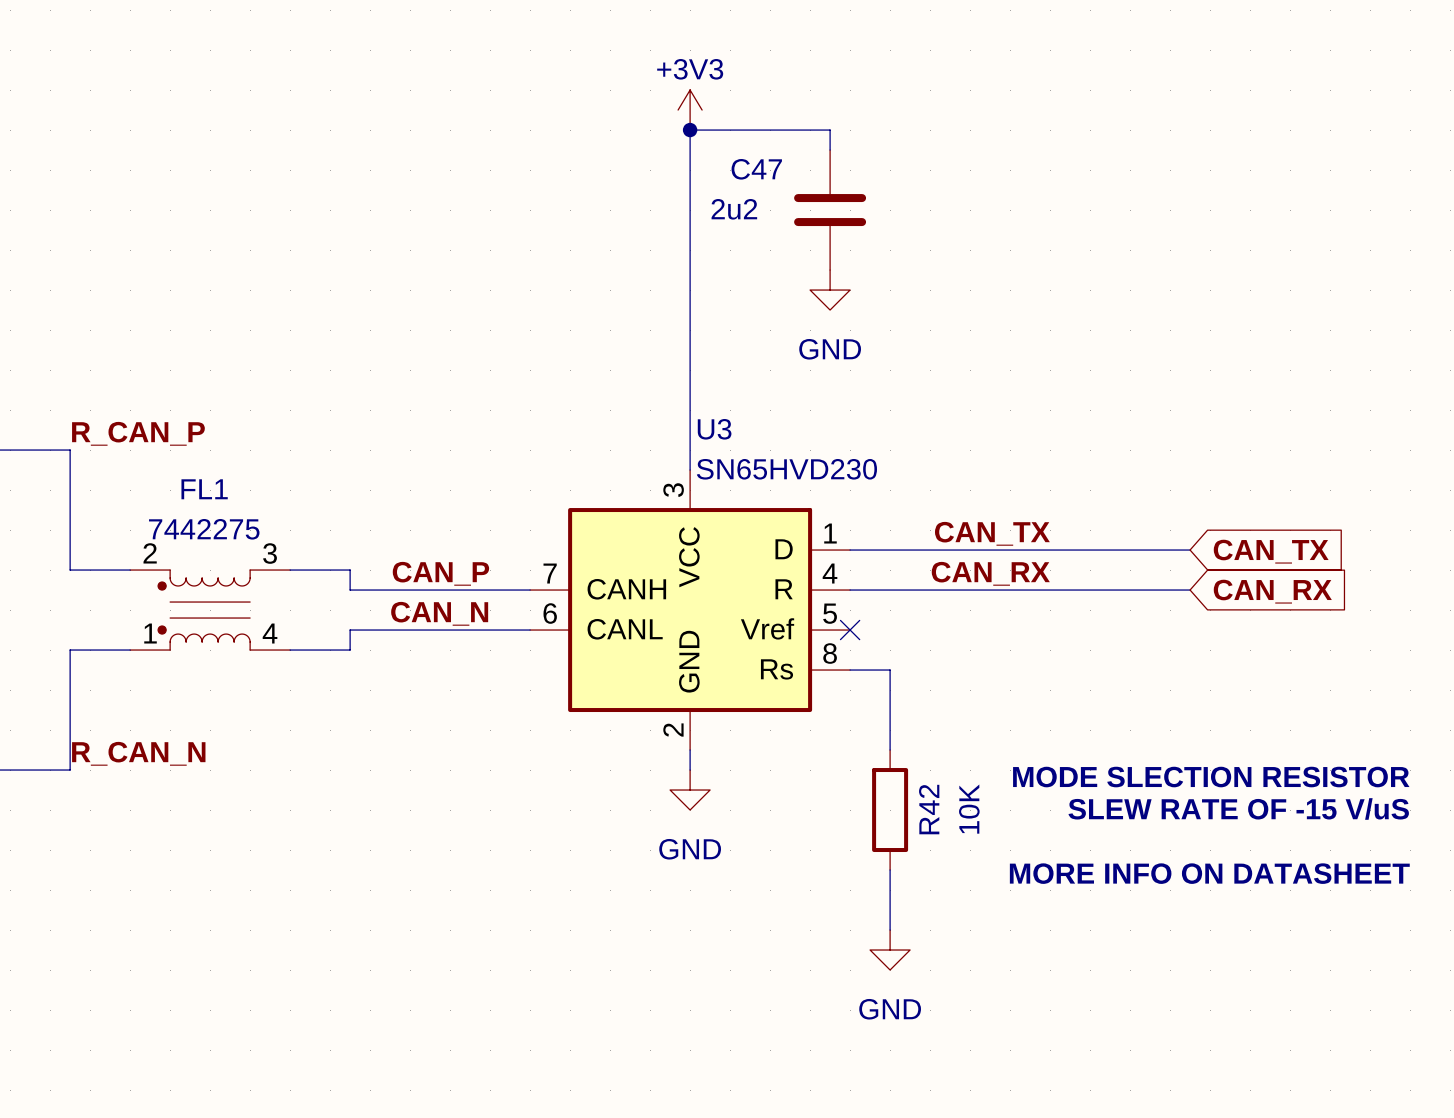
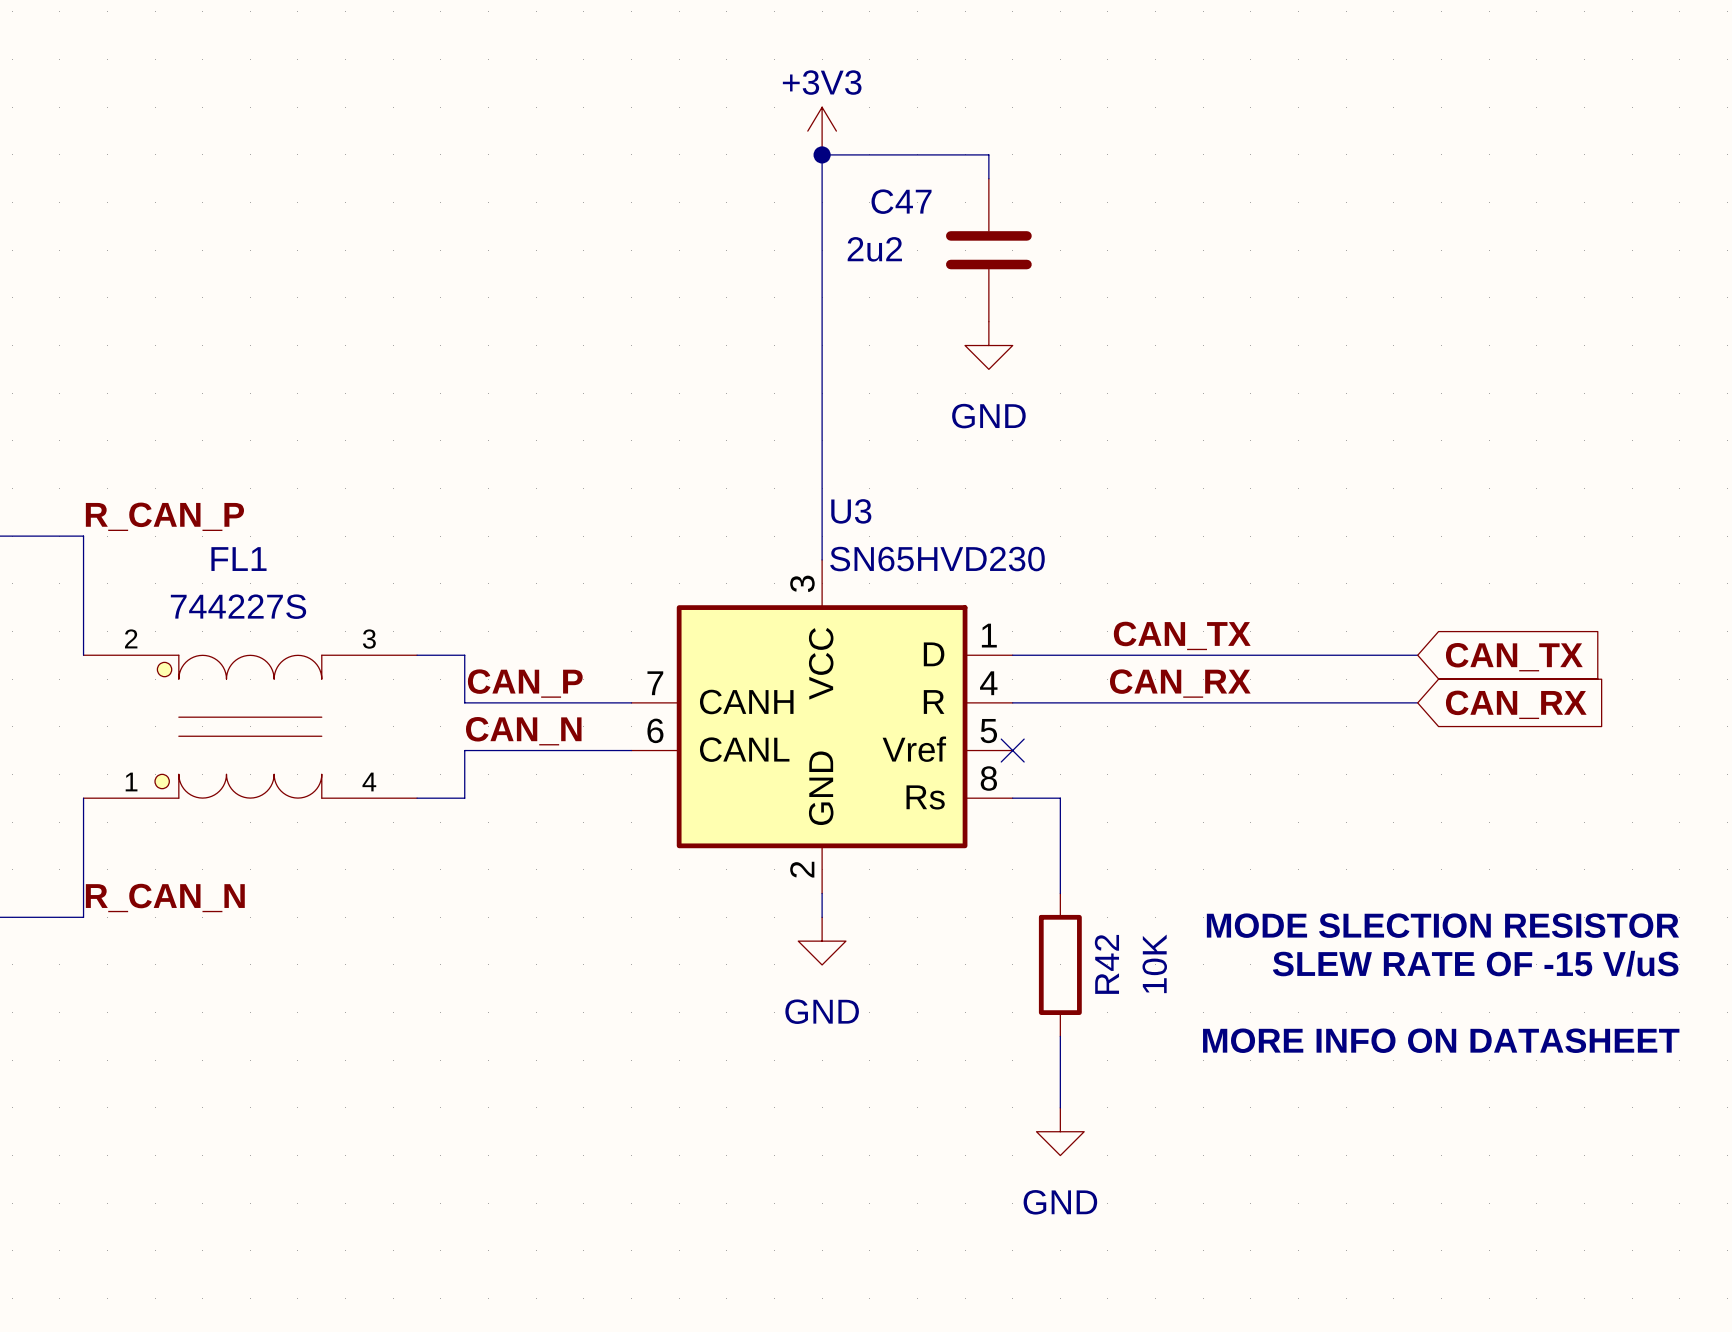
FL1 value: 7442275 (204, 529) -> 744227S (238, 606)
wire: (70, 550) (70, 570) (130, 570) -> none
FL1 symbol: [130, 570, 291, 651] -> [83, 655, 418, 799]
wire: (290, 570) (350, 570) (350, 590) (390, 590) -> (417, 655) (464, 655) (464, 702)
wire: (390, 630) (350, 630) (350, 650) (290, 650) -> (464, 750) (464, 798) (417, 798)
wire: (130, 650) (70, 650) (70, 670) -> none

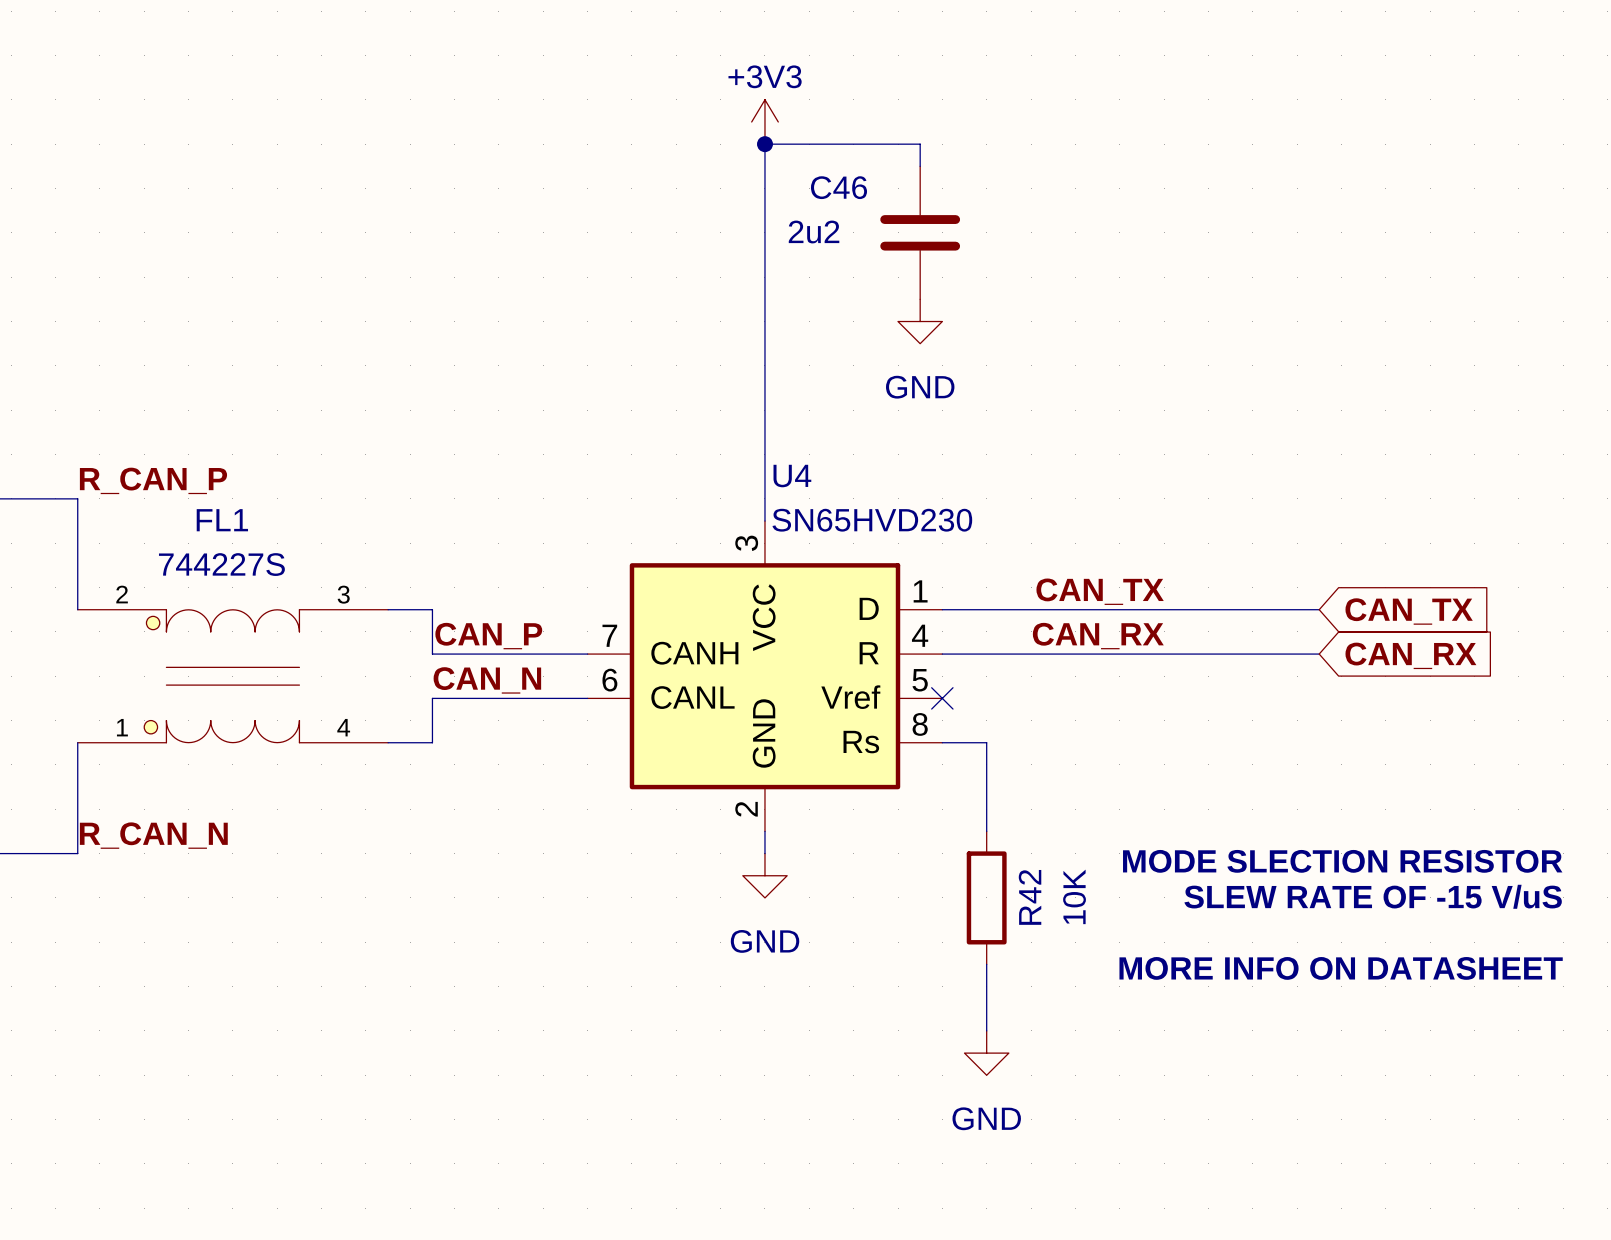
C47 name: C47 (901, 201) -> C46 (838, 187)
U3 name: U3 (851, 511) -> U4 (792, 476)

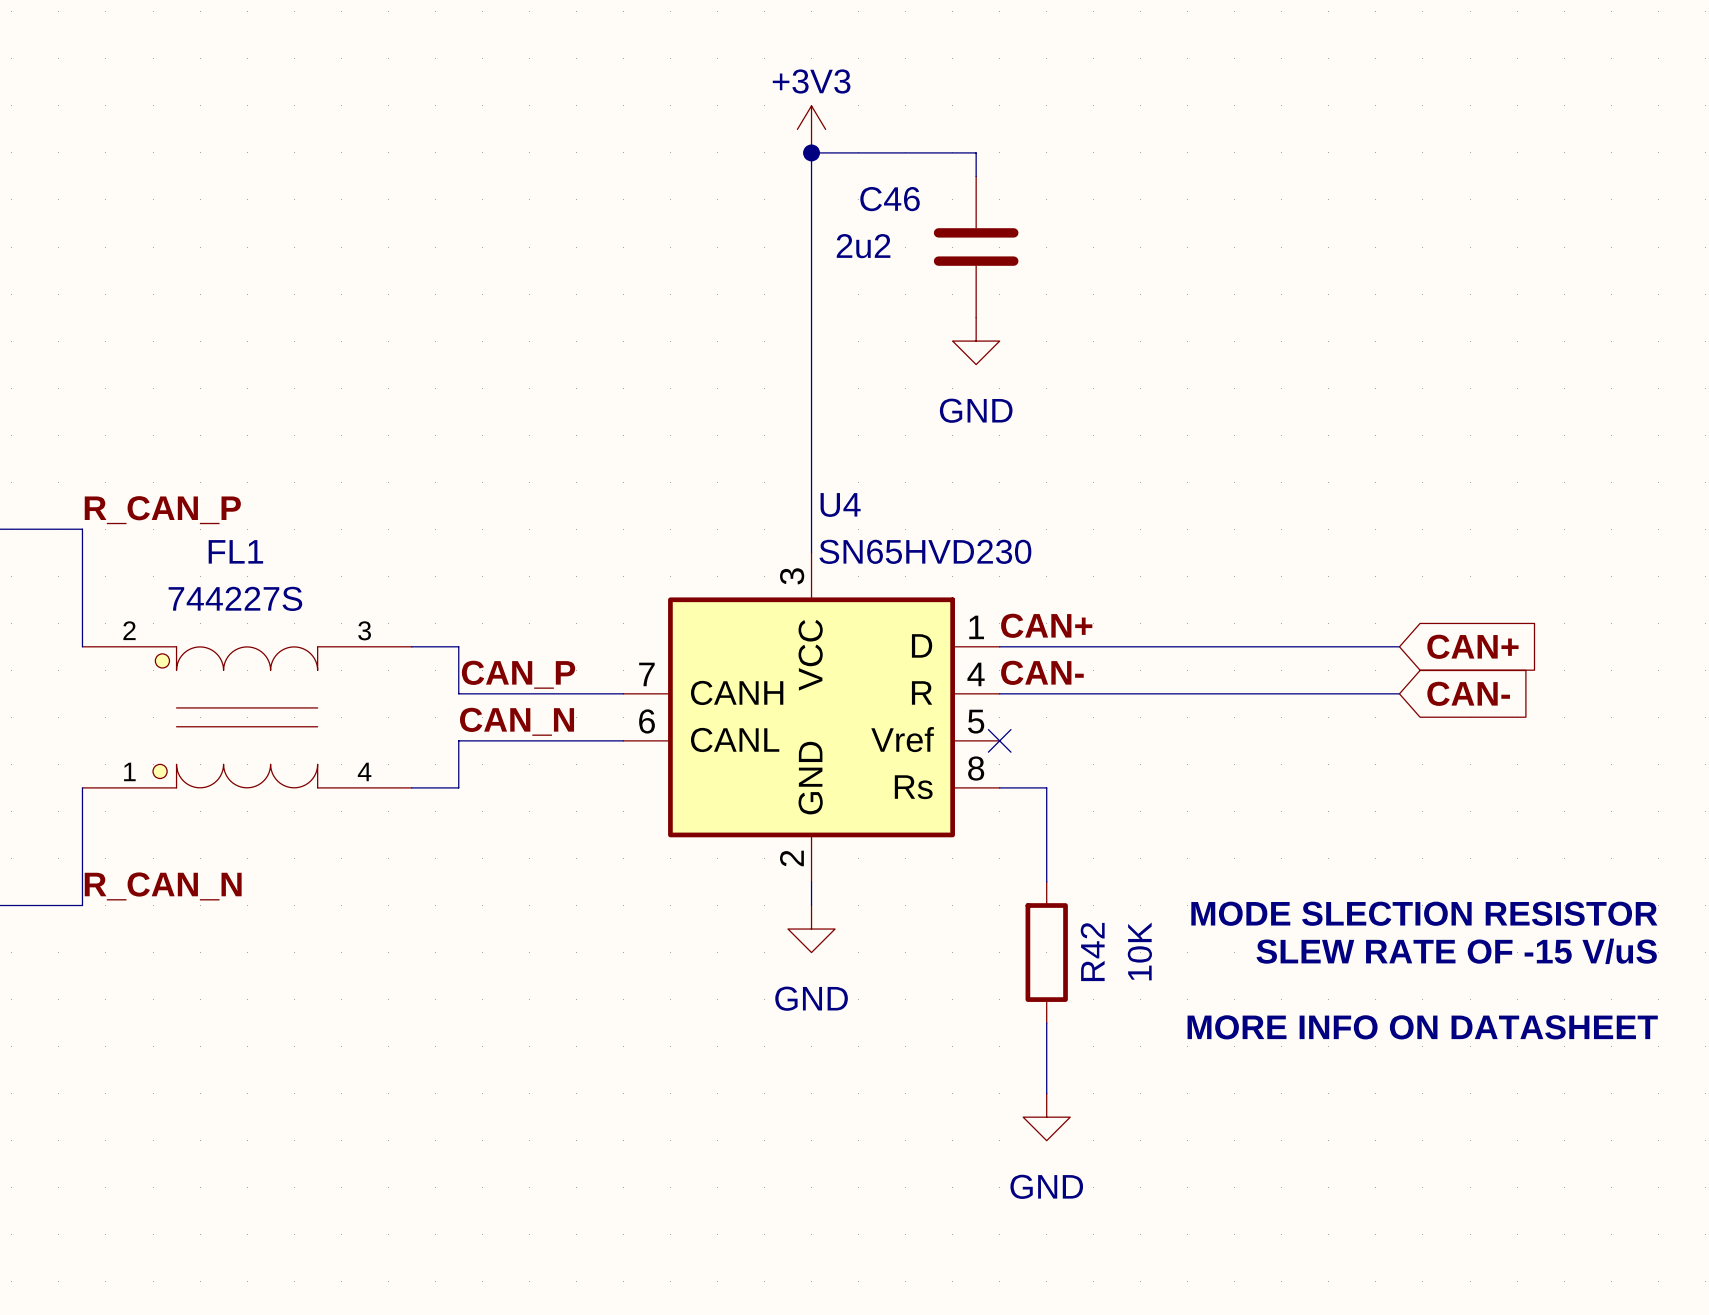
label: none -> CAN+ (1046, 625)
label: CAN_TX (1100, 591) -> none
global label: CAN_TX (1409, 611) -> CAN+ (1472, 646)
label: none -> CAN- (1042, 672)
label: CAN_RX (1098, 636) -> none
global label: CAN_RX (1410, 655) -> CAN- (1468, 693)

